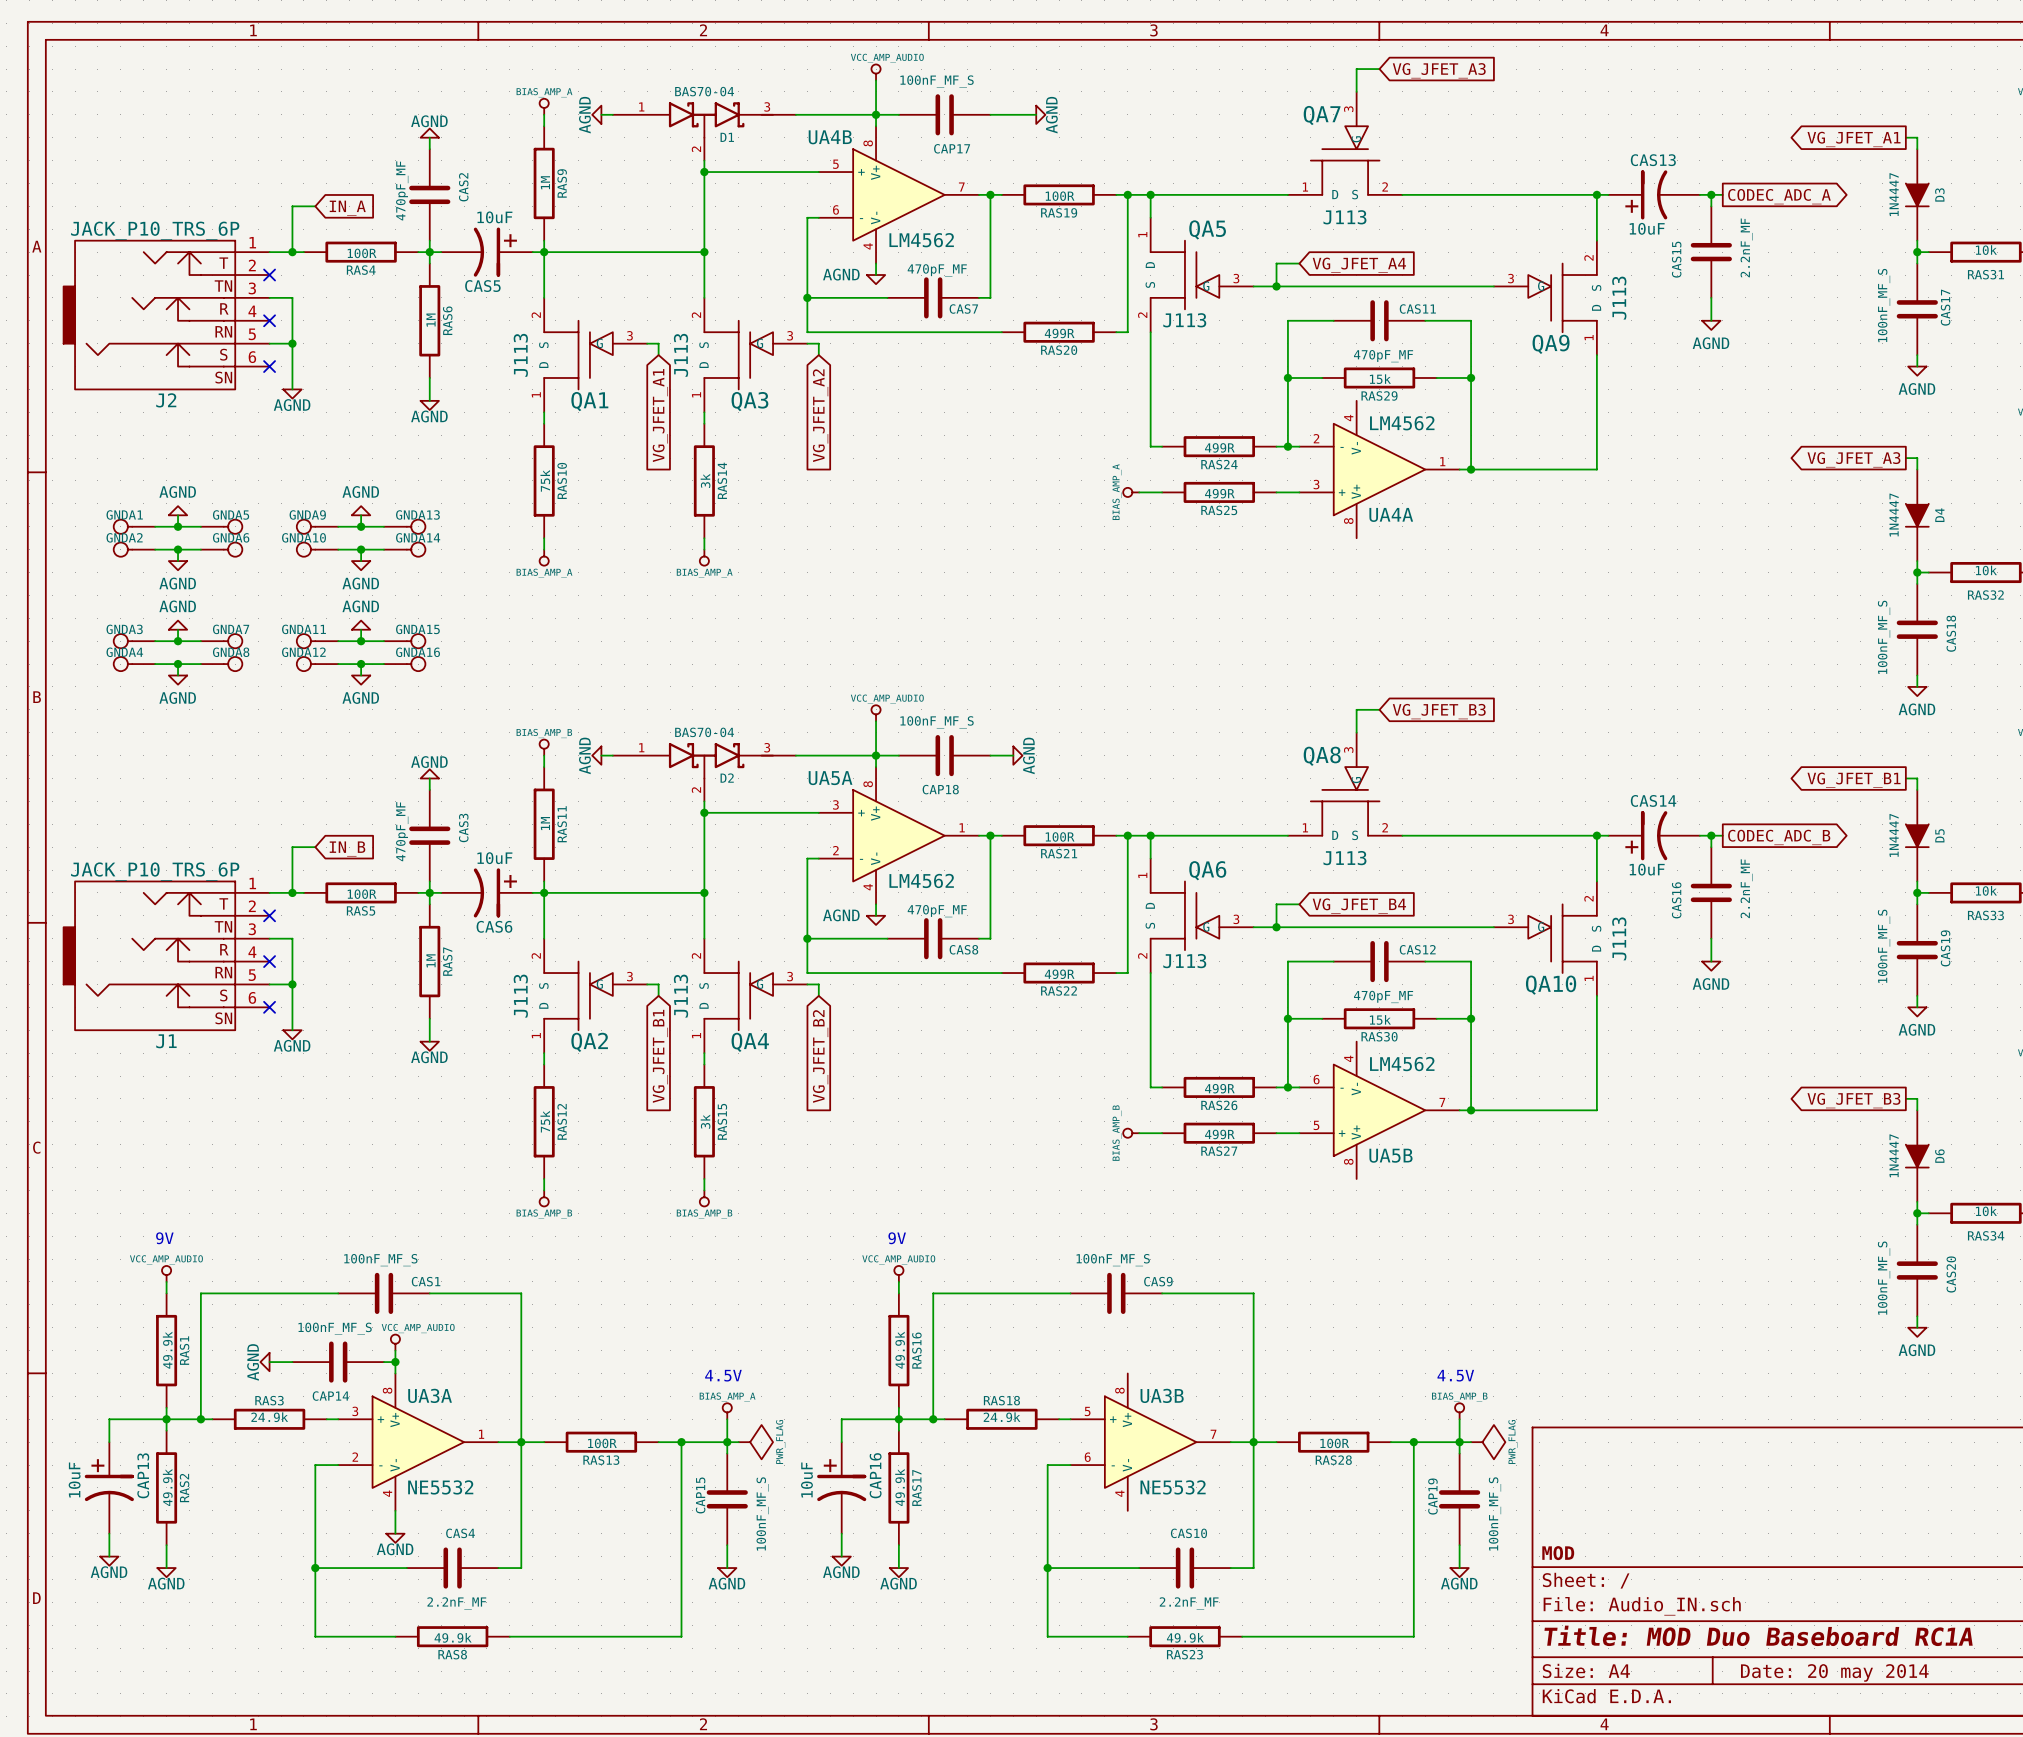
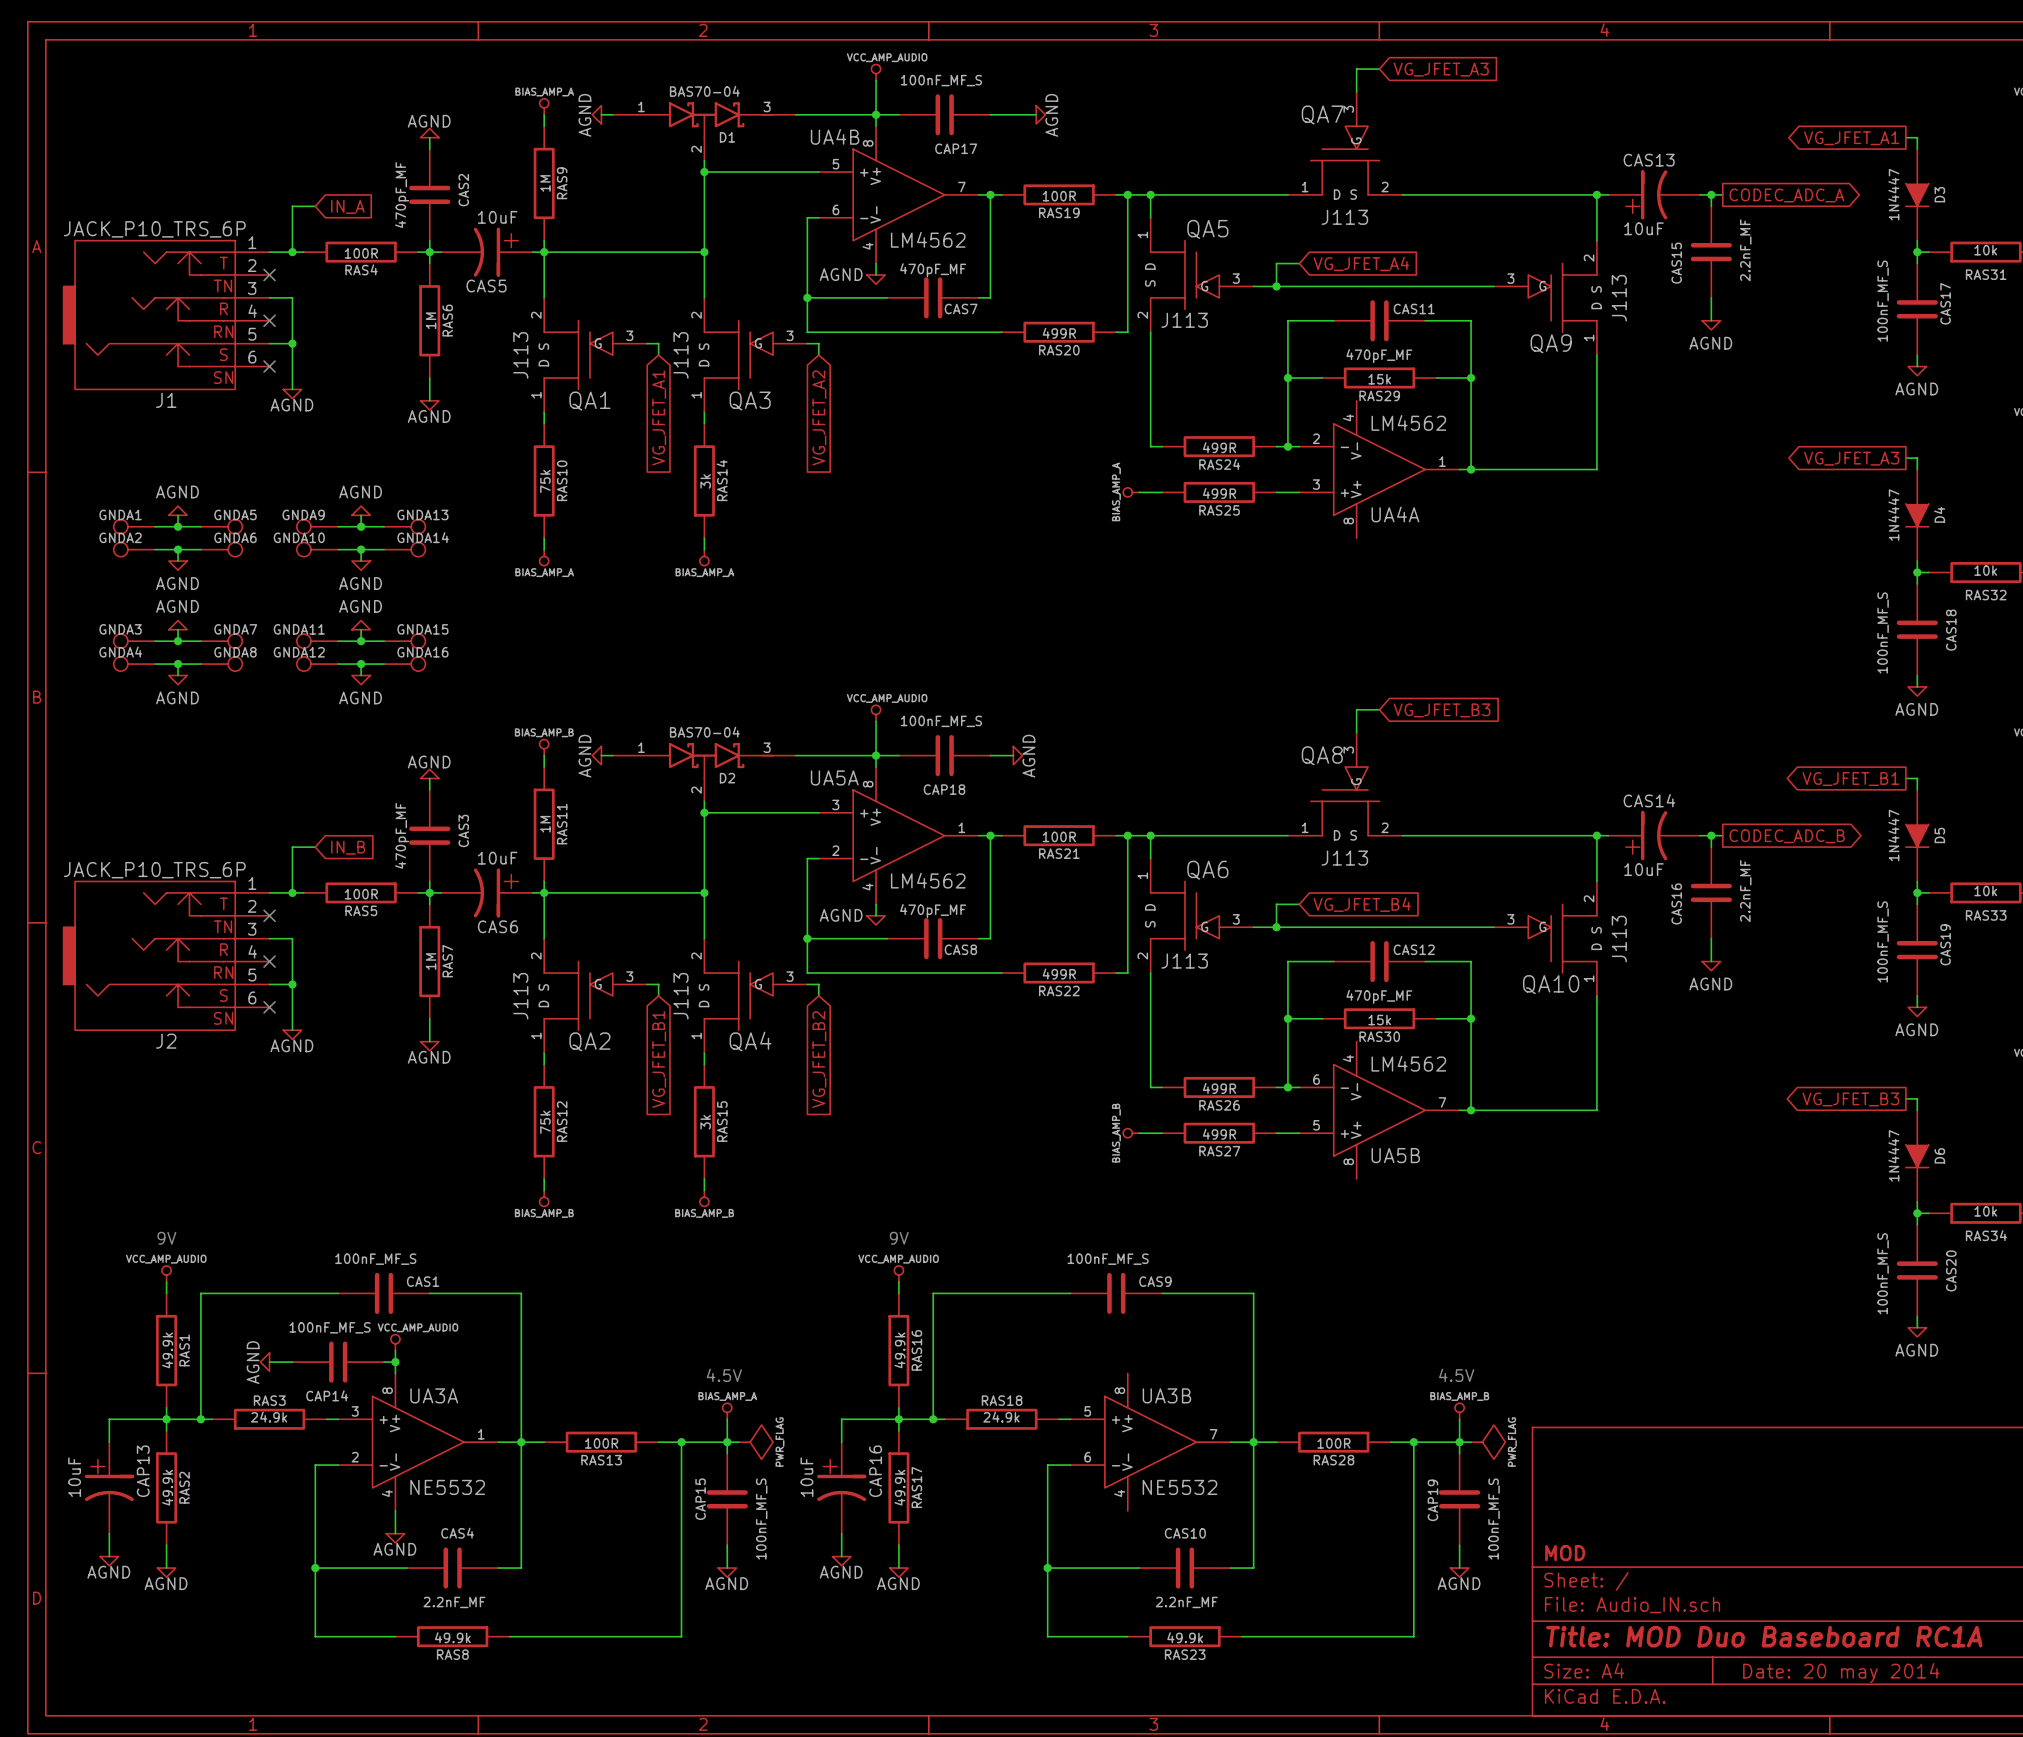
J2 name: J2 (166, 400) -> J1 (166, 400)
J1 name: J1 (166, 1041) -> J2 (166, 1041)

